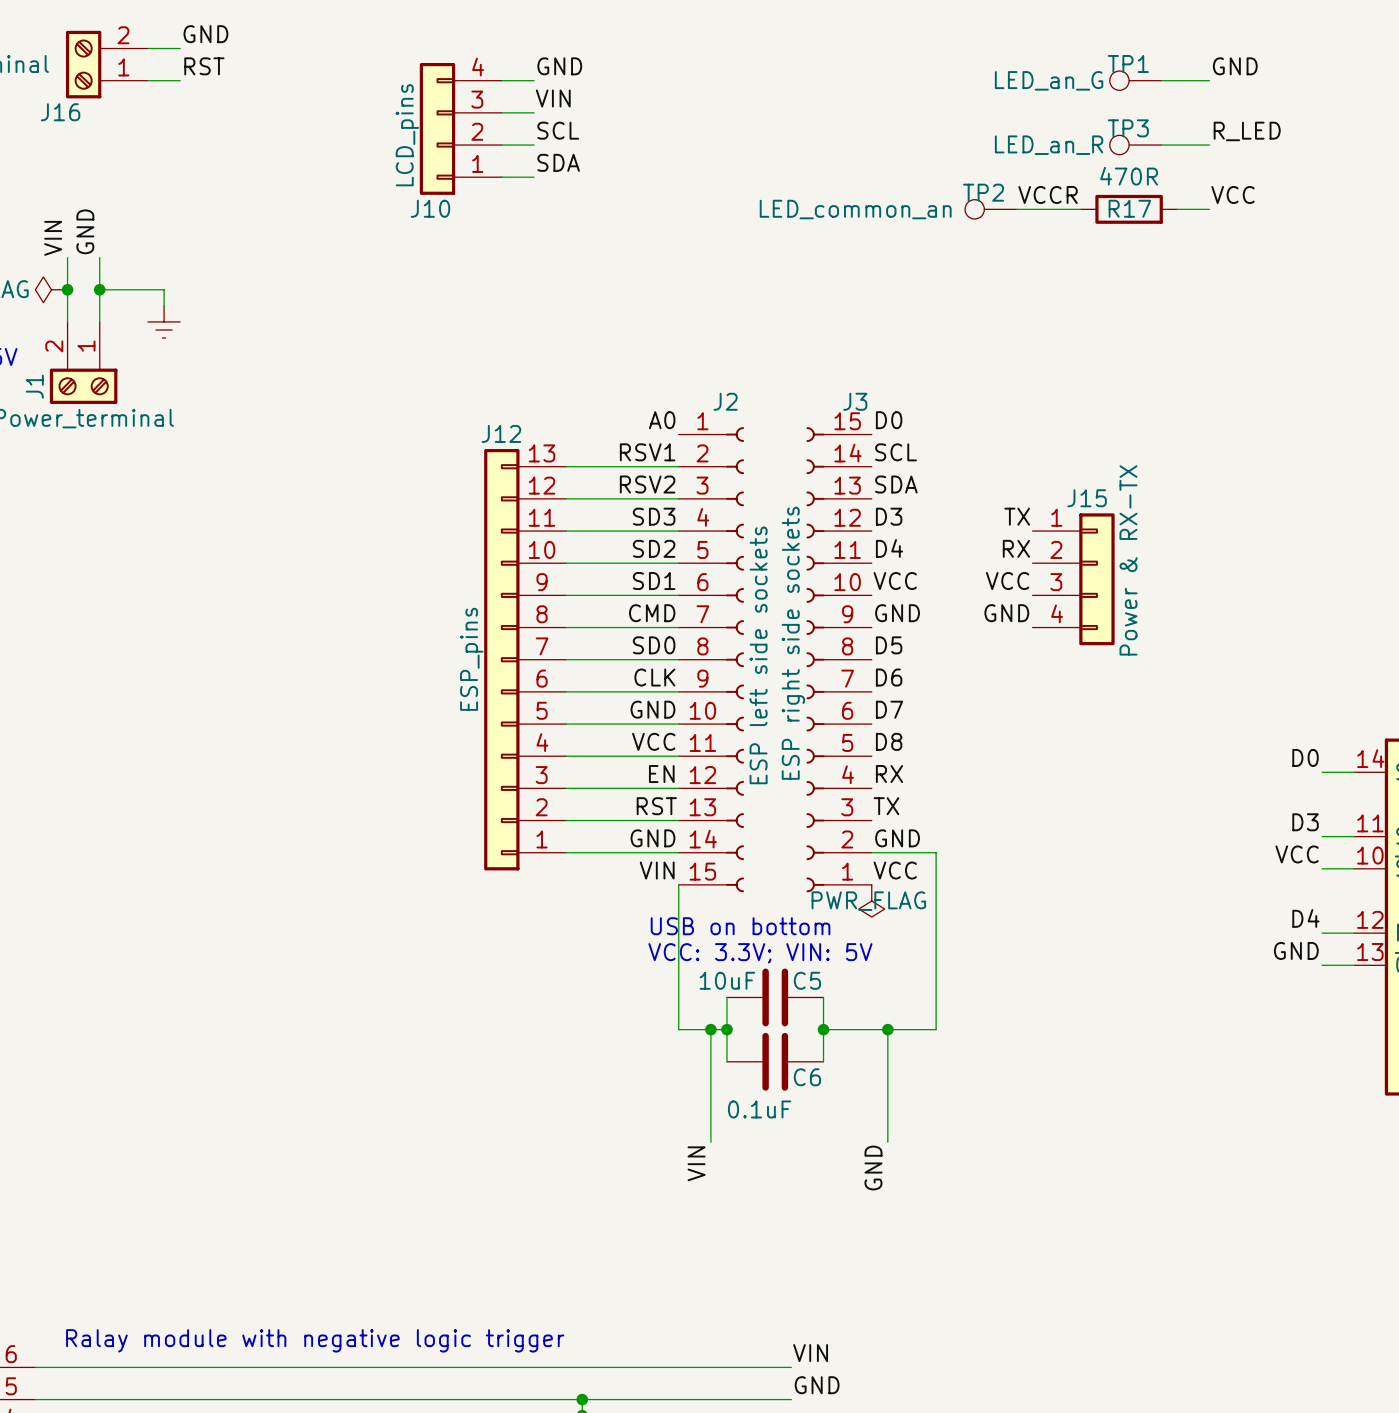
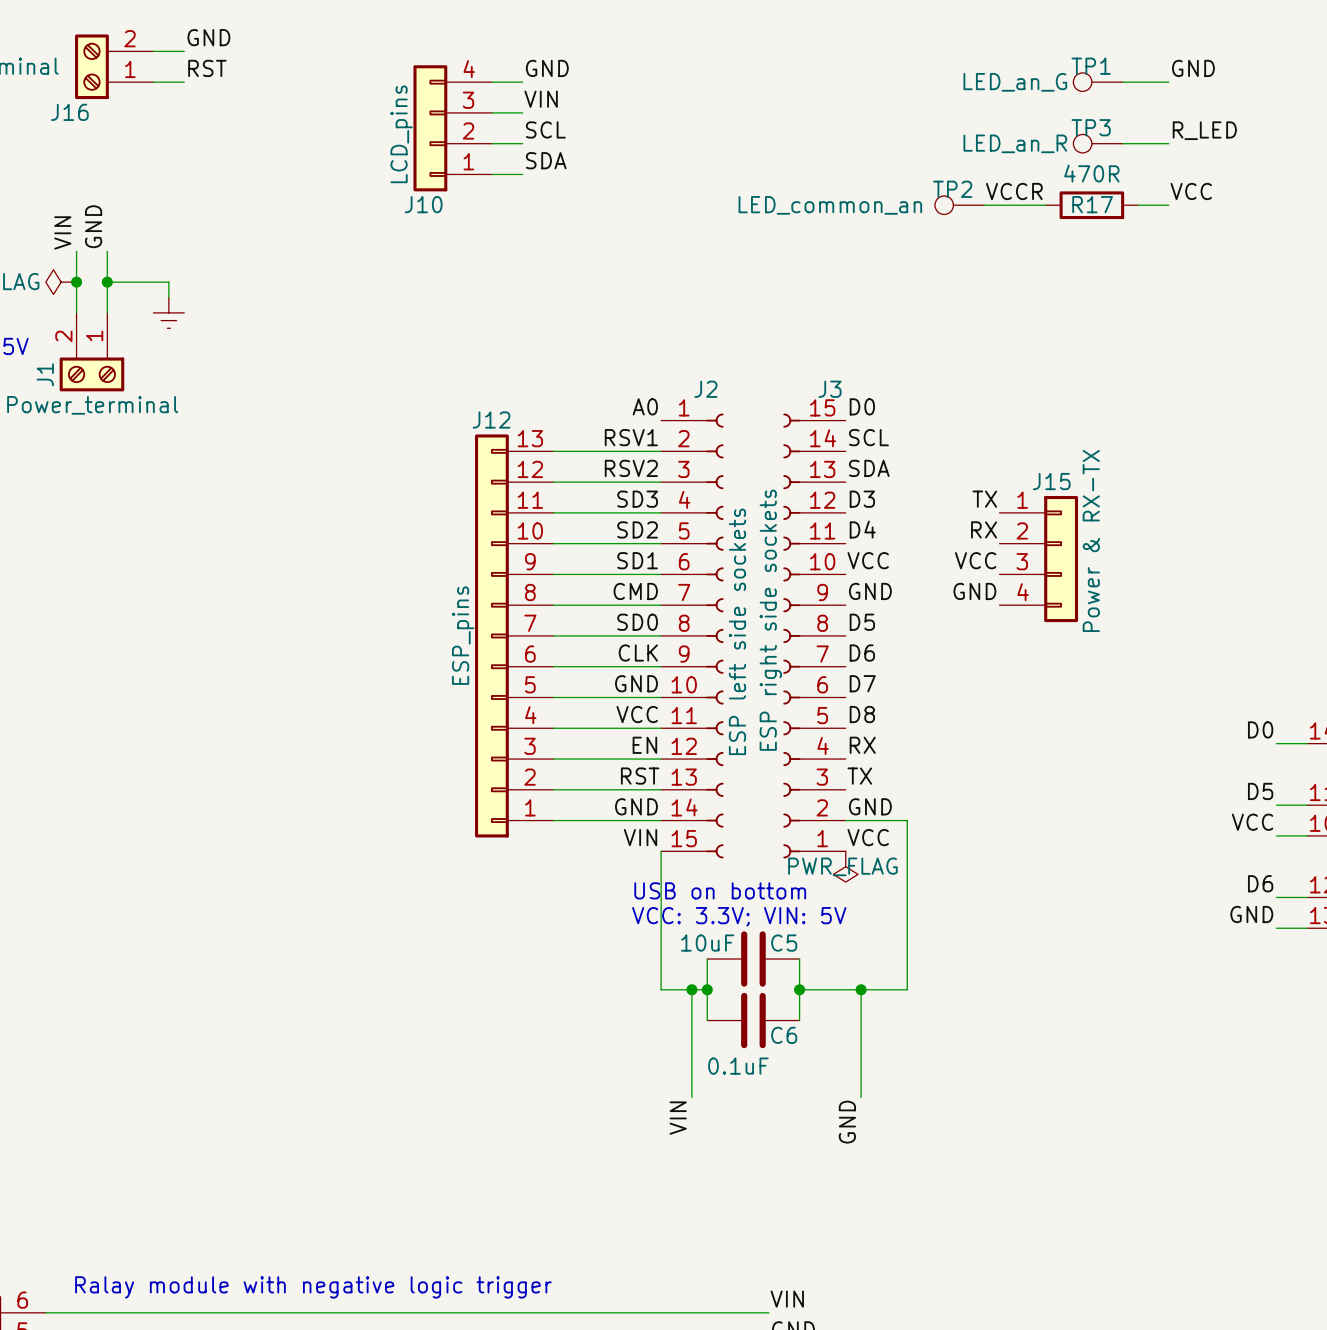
label: D3 (1305, 822) -> D5 (1260, 791)
label: D4 (1305, 918) -> D6 (1260, 883)

